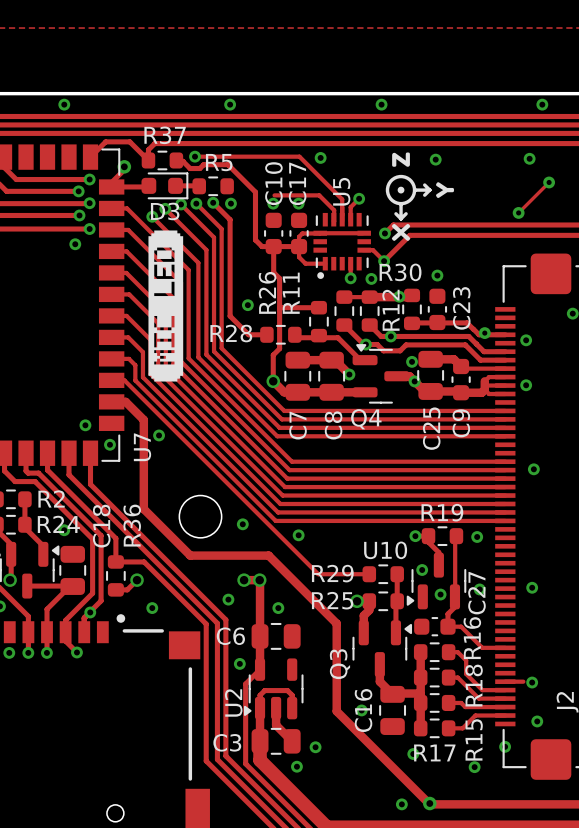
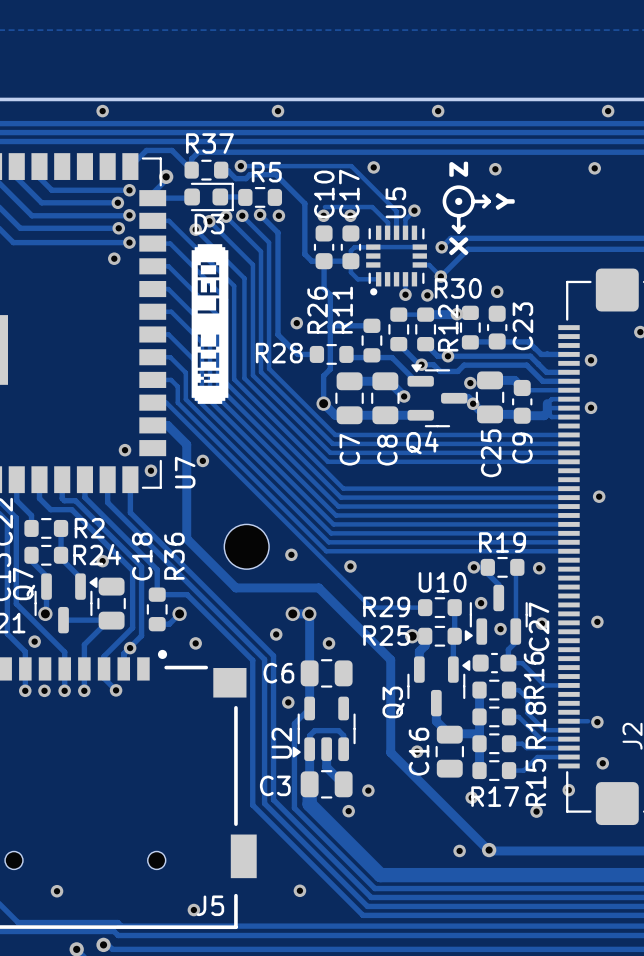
track: (549, 182) (518, 212) -> none
via: (549, 182) -> none
via: (518, 212) -> none
via: (484, 333) -> none

